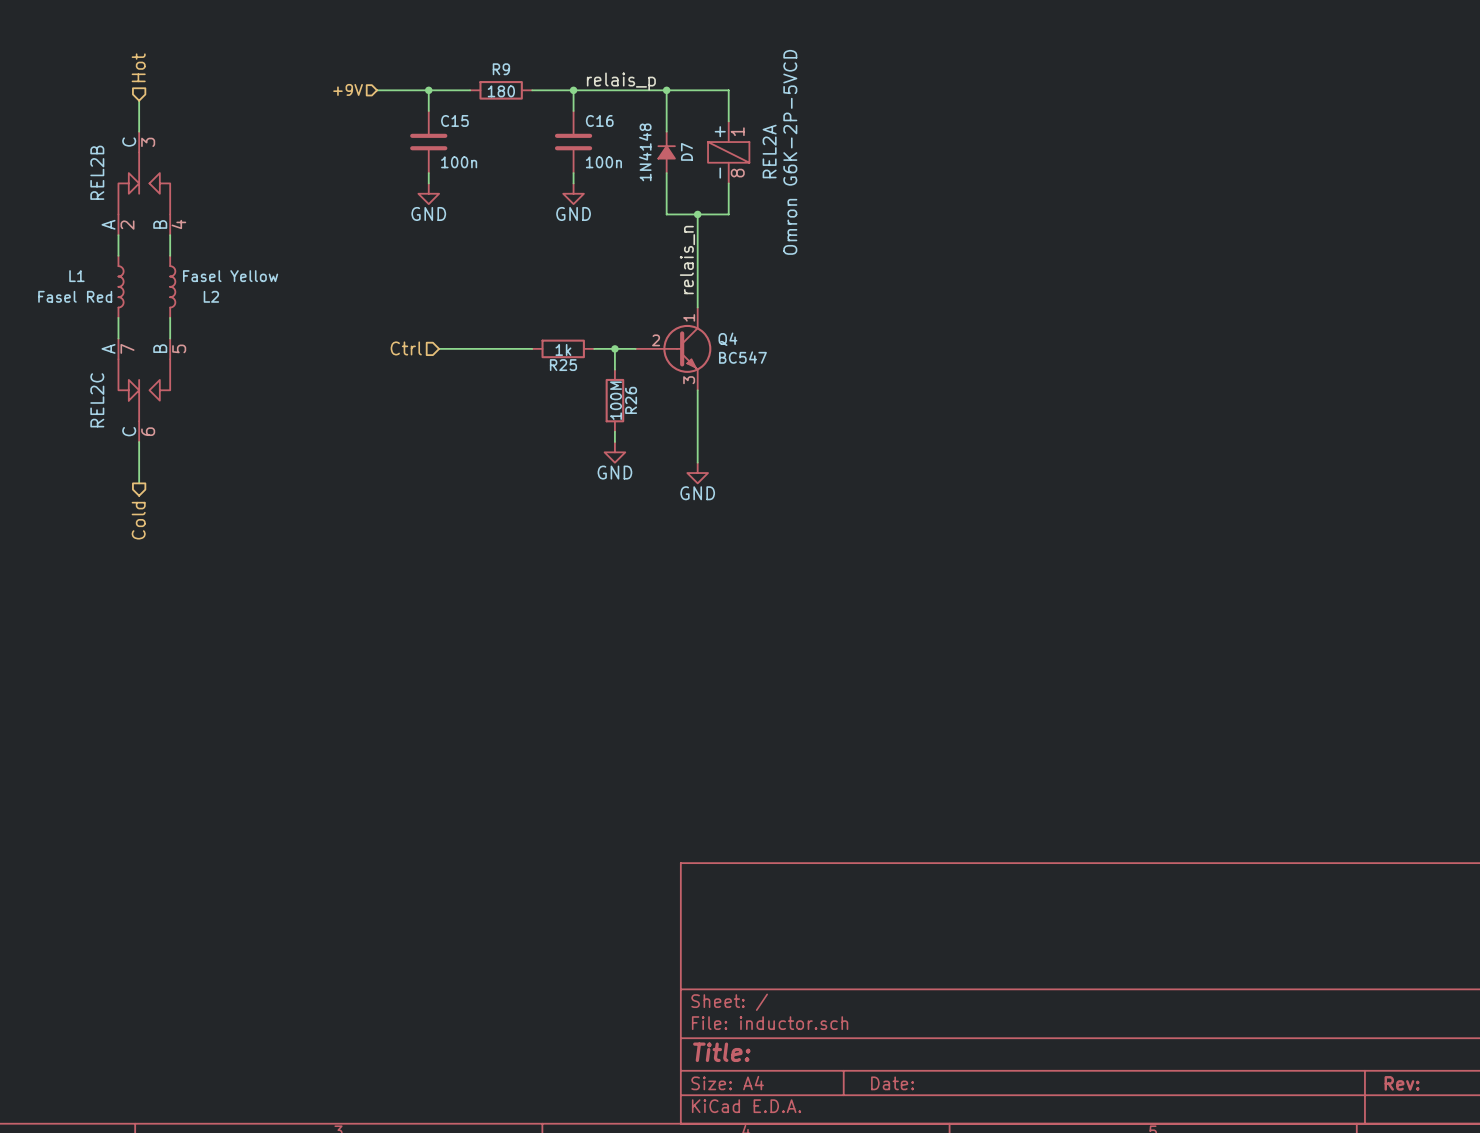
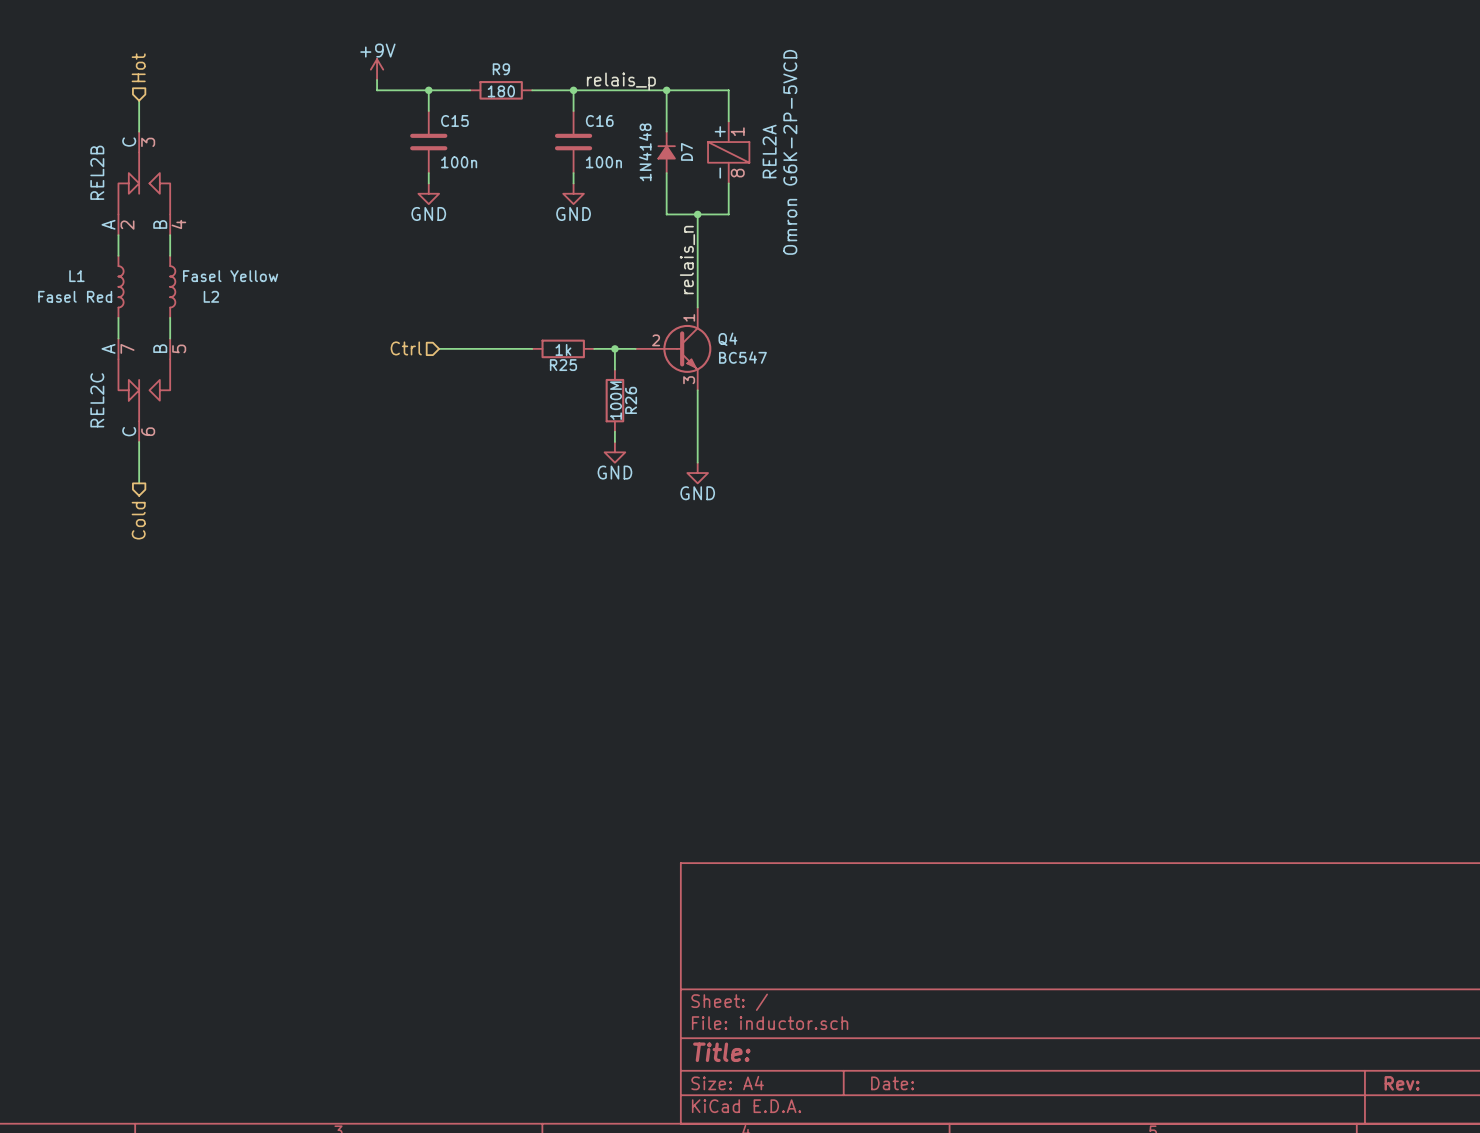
power symbol: none -> +9V (377, 69)
wire: none -> (377, 79) (377, 90)
hierarchical label: +9V (348, 89) -> none

